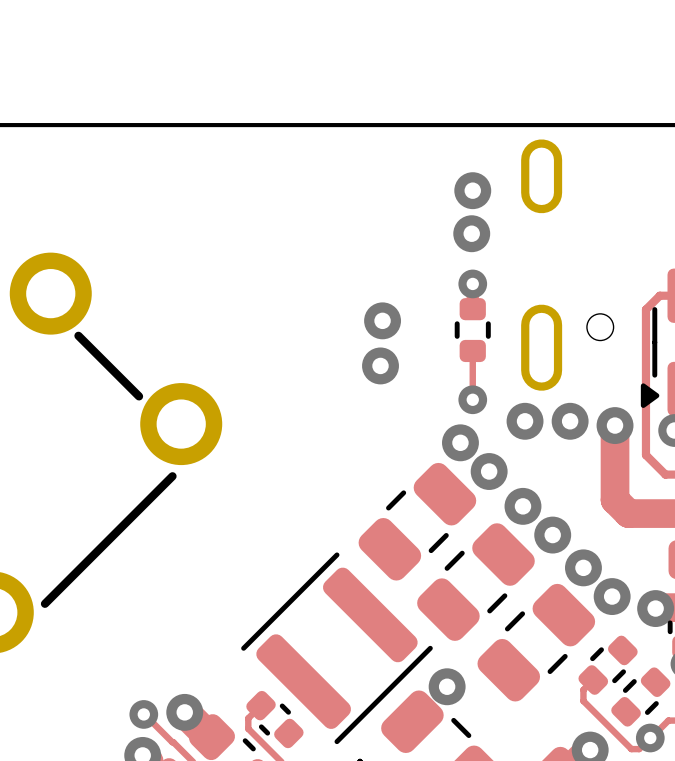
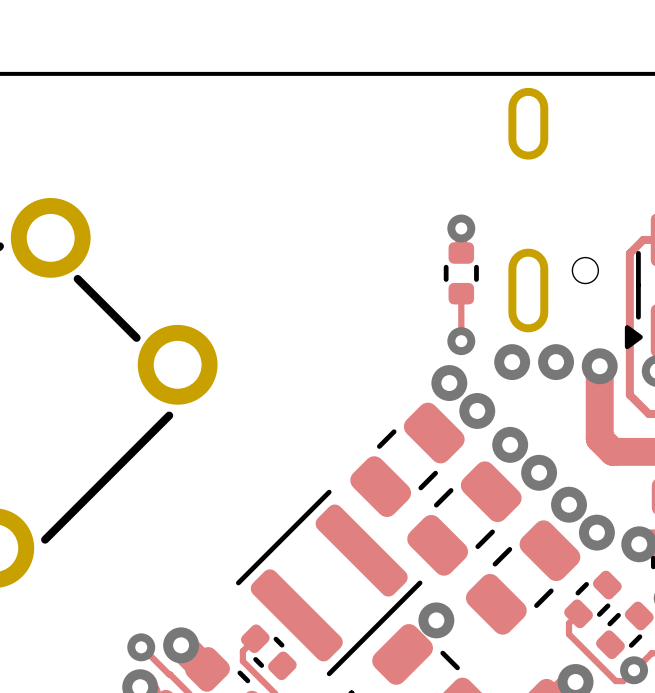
via: (472, 190) -> none
via: (471, 233) -> none
via: (382, 320) -> none
via: (380, 365) -> none

